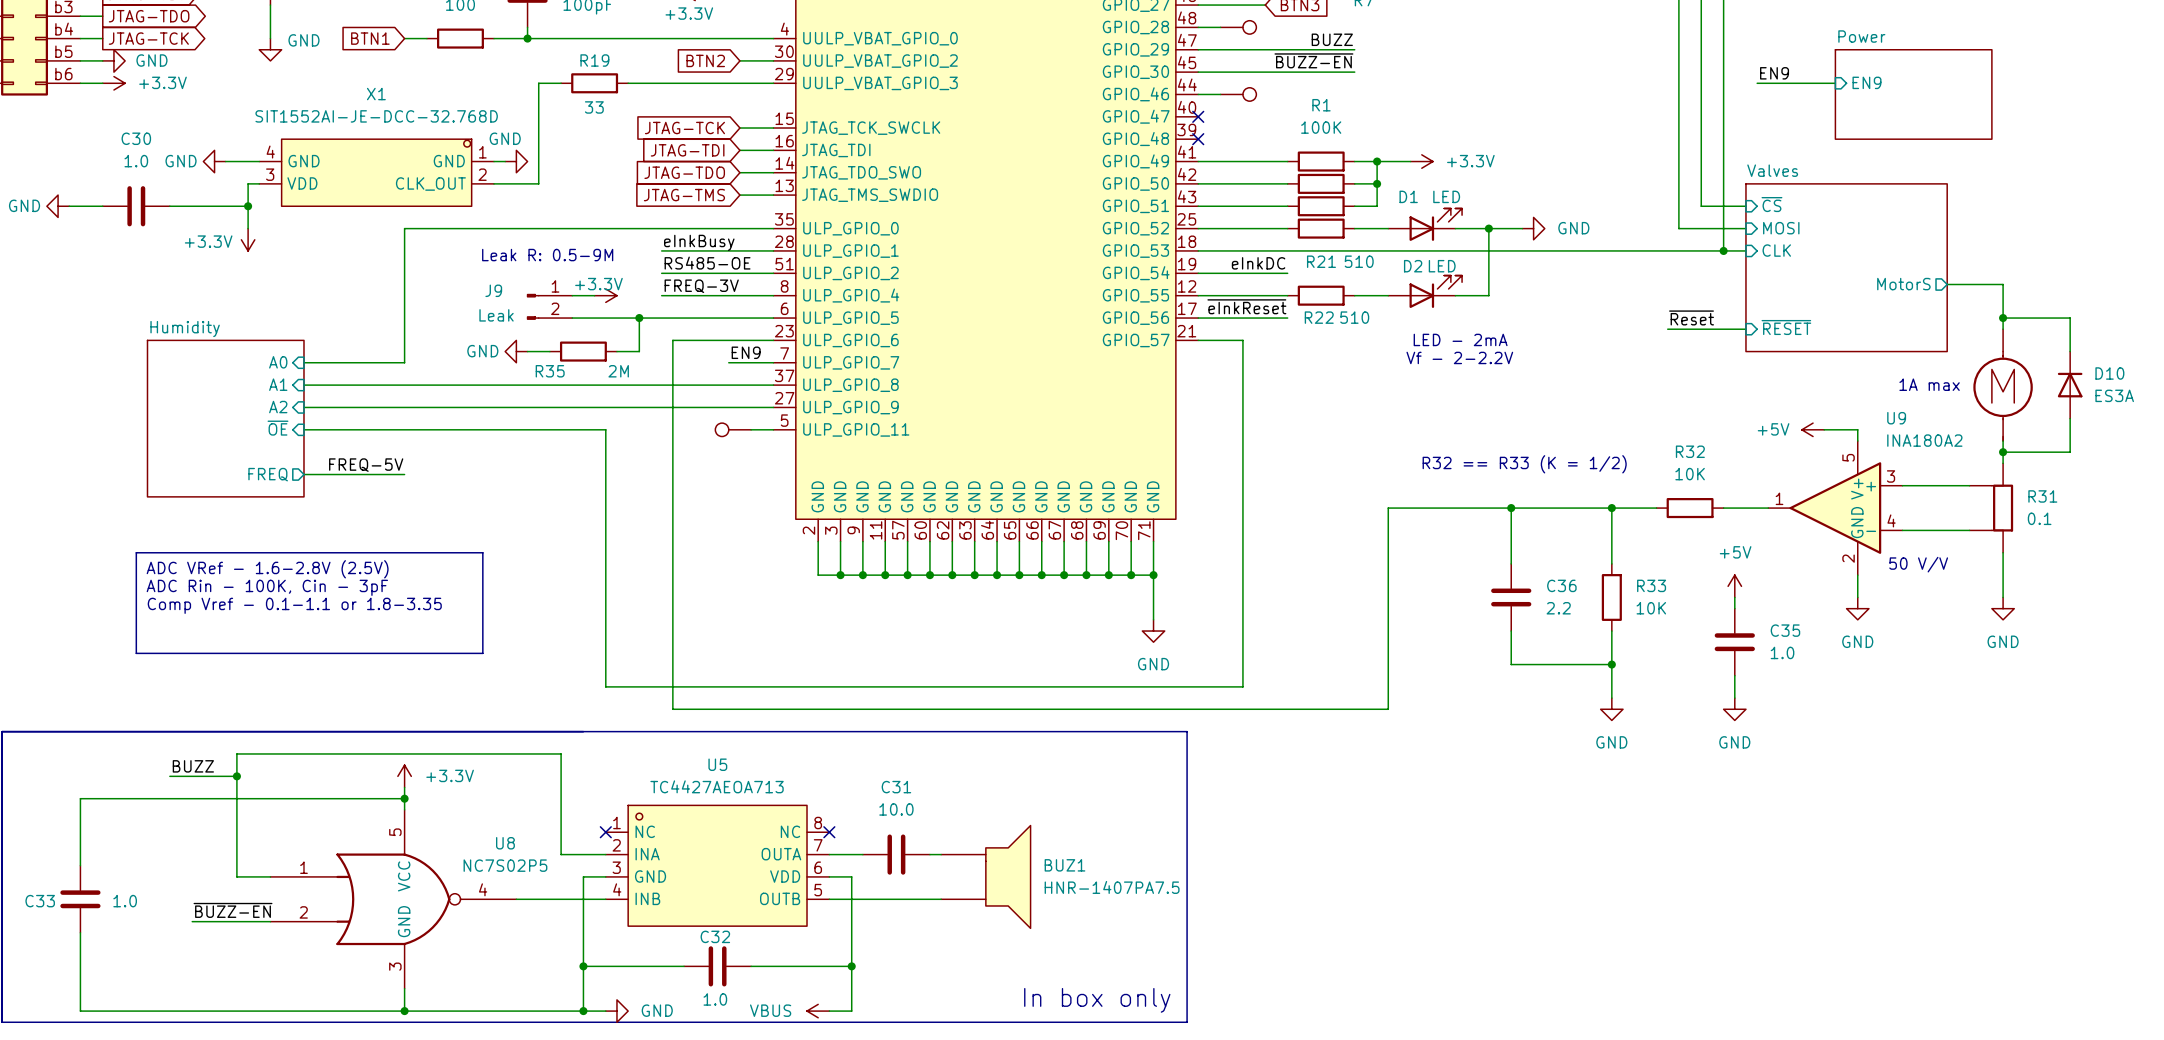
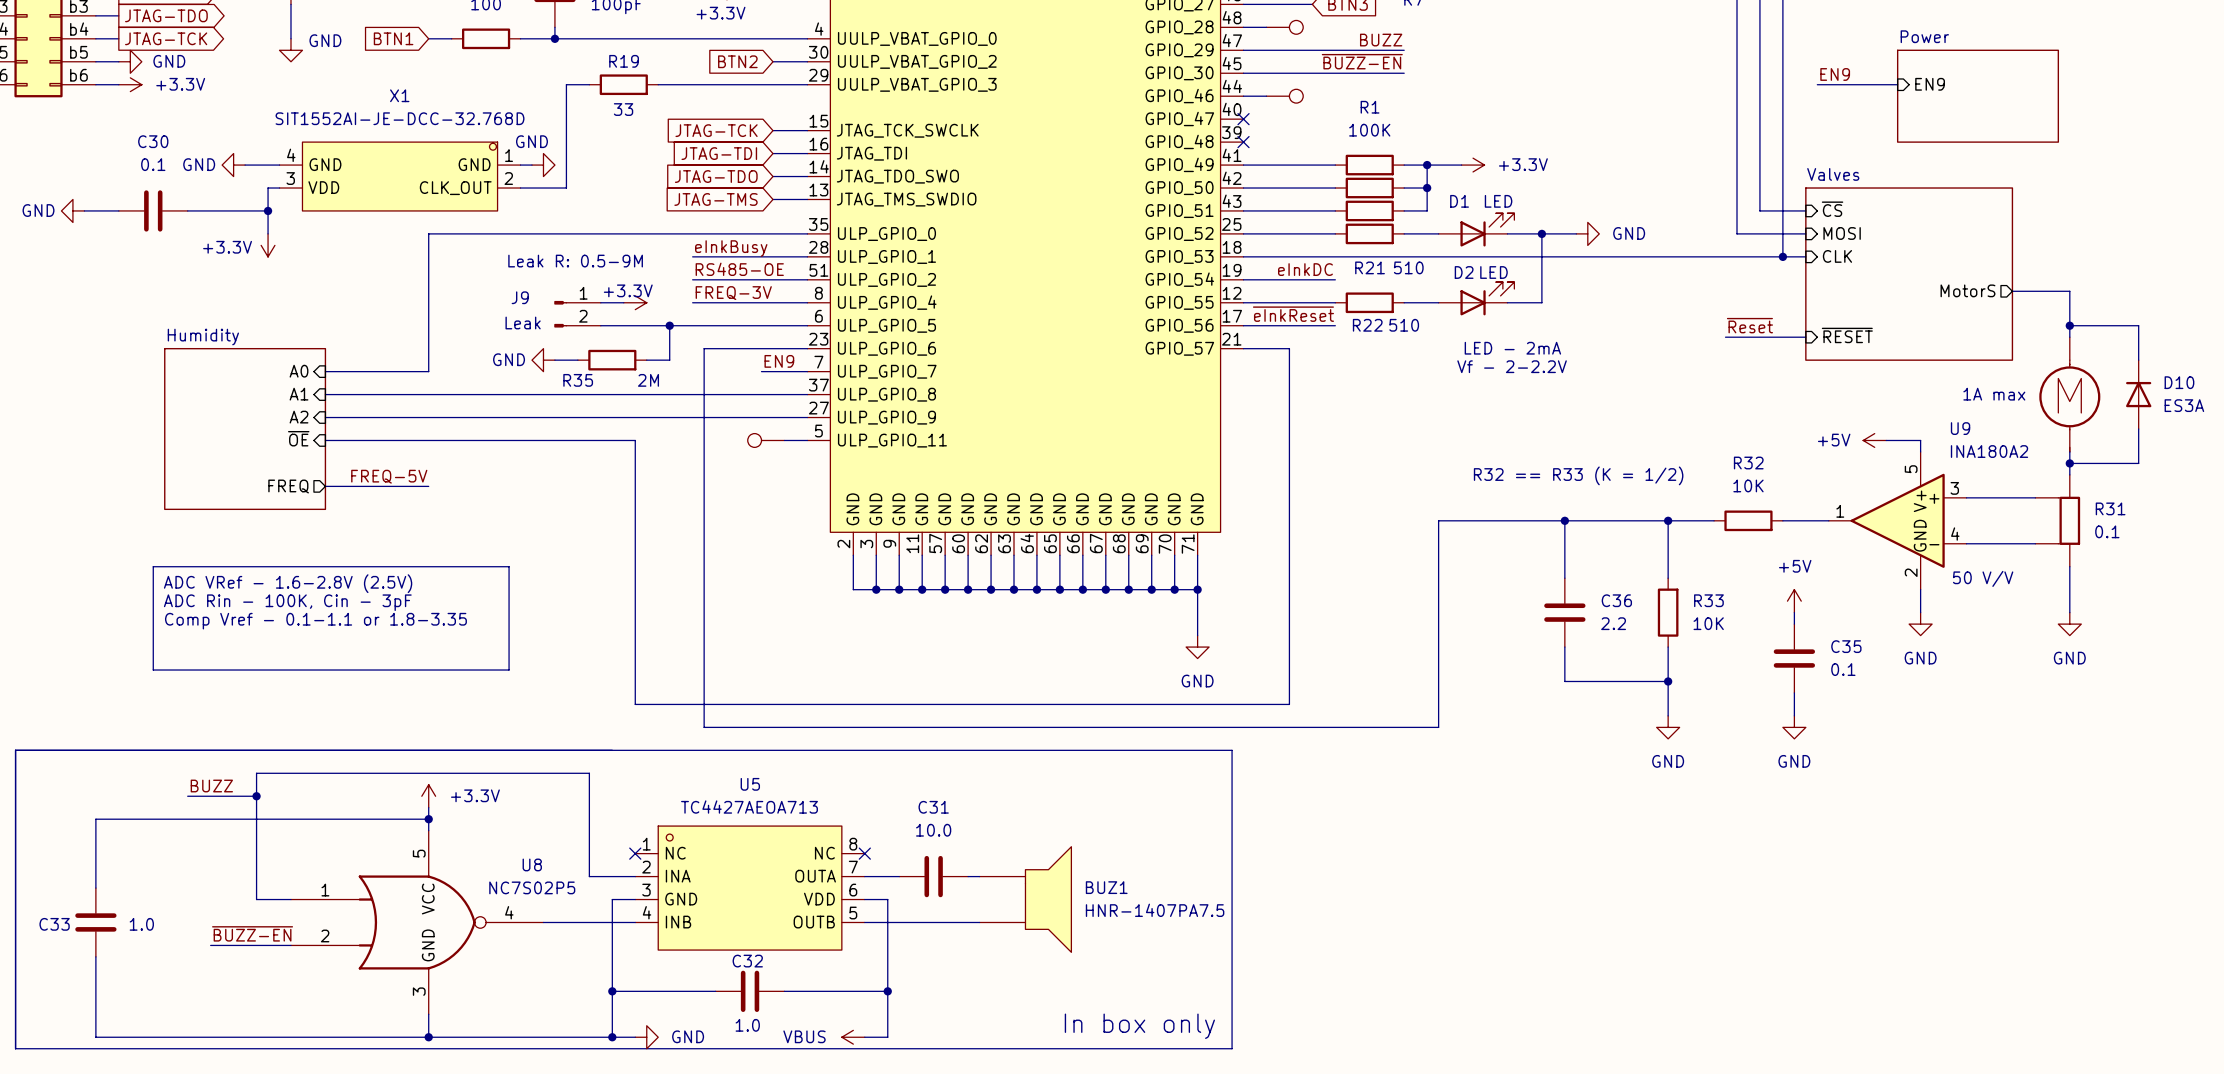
C30 value: 1.0 (136, 161) -> 0.1 (153, 164)
C35 value: 1.0 (1782, 652) -> 0.1 (1843, 669)

